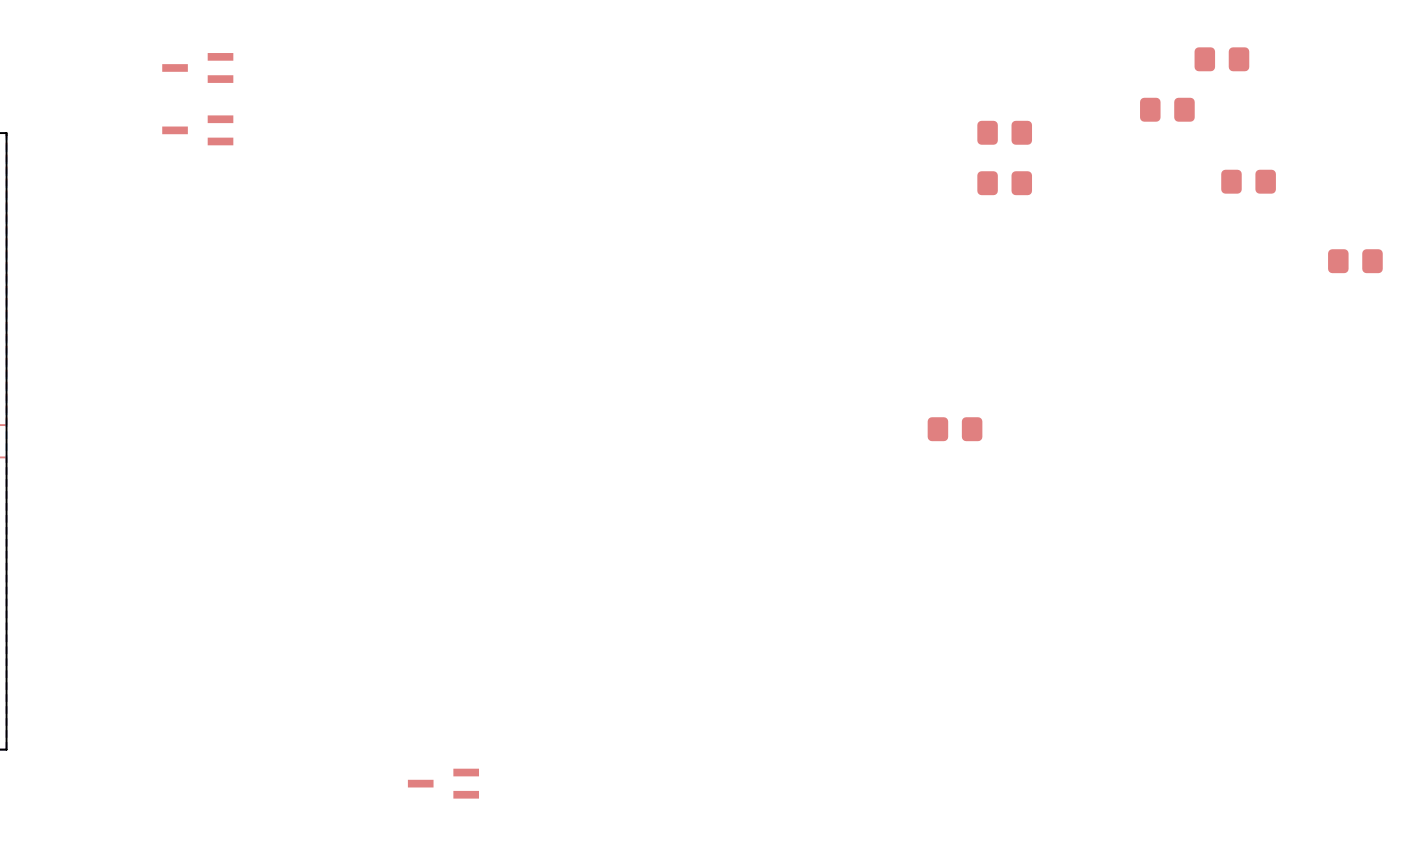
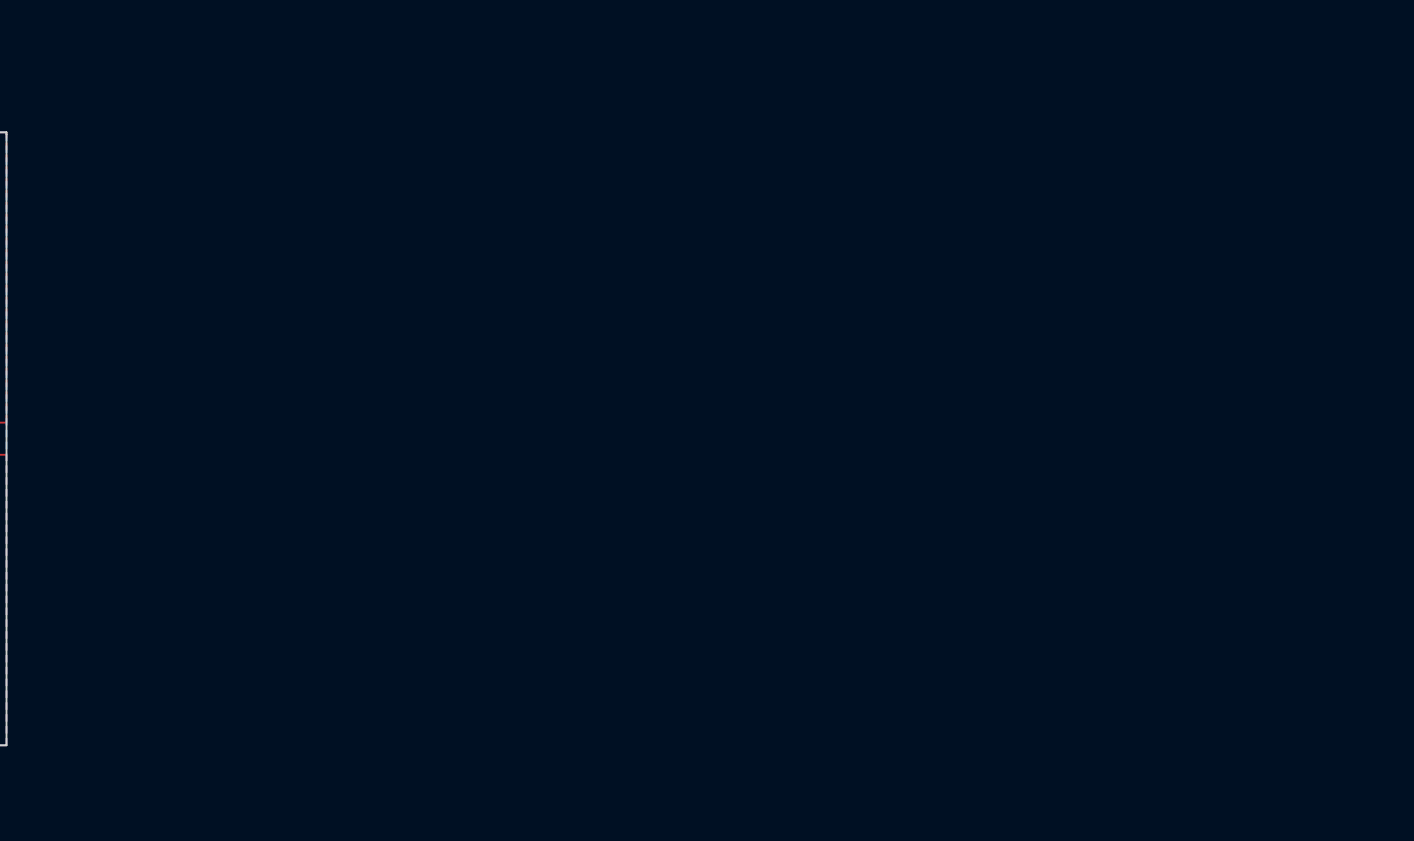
part: (1221, 59) -> none
part: (197, 67) -> none
part: (1167, 109) -> none
part: (197, 130) -> none
part: (1004, 132) -> none
part: (1248, 181) -> none
part: (1004, 183) -> none
part: (1355, 261) -> none
part: (955, 429) -> none
part: (443, 783) -> none

